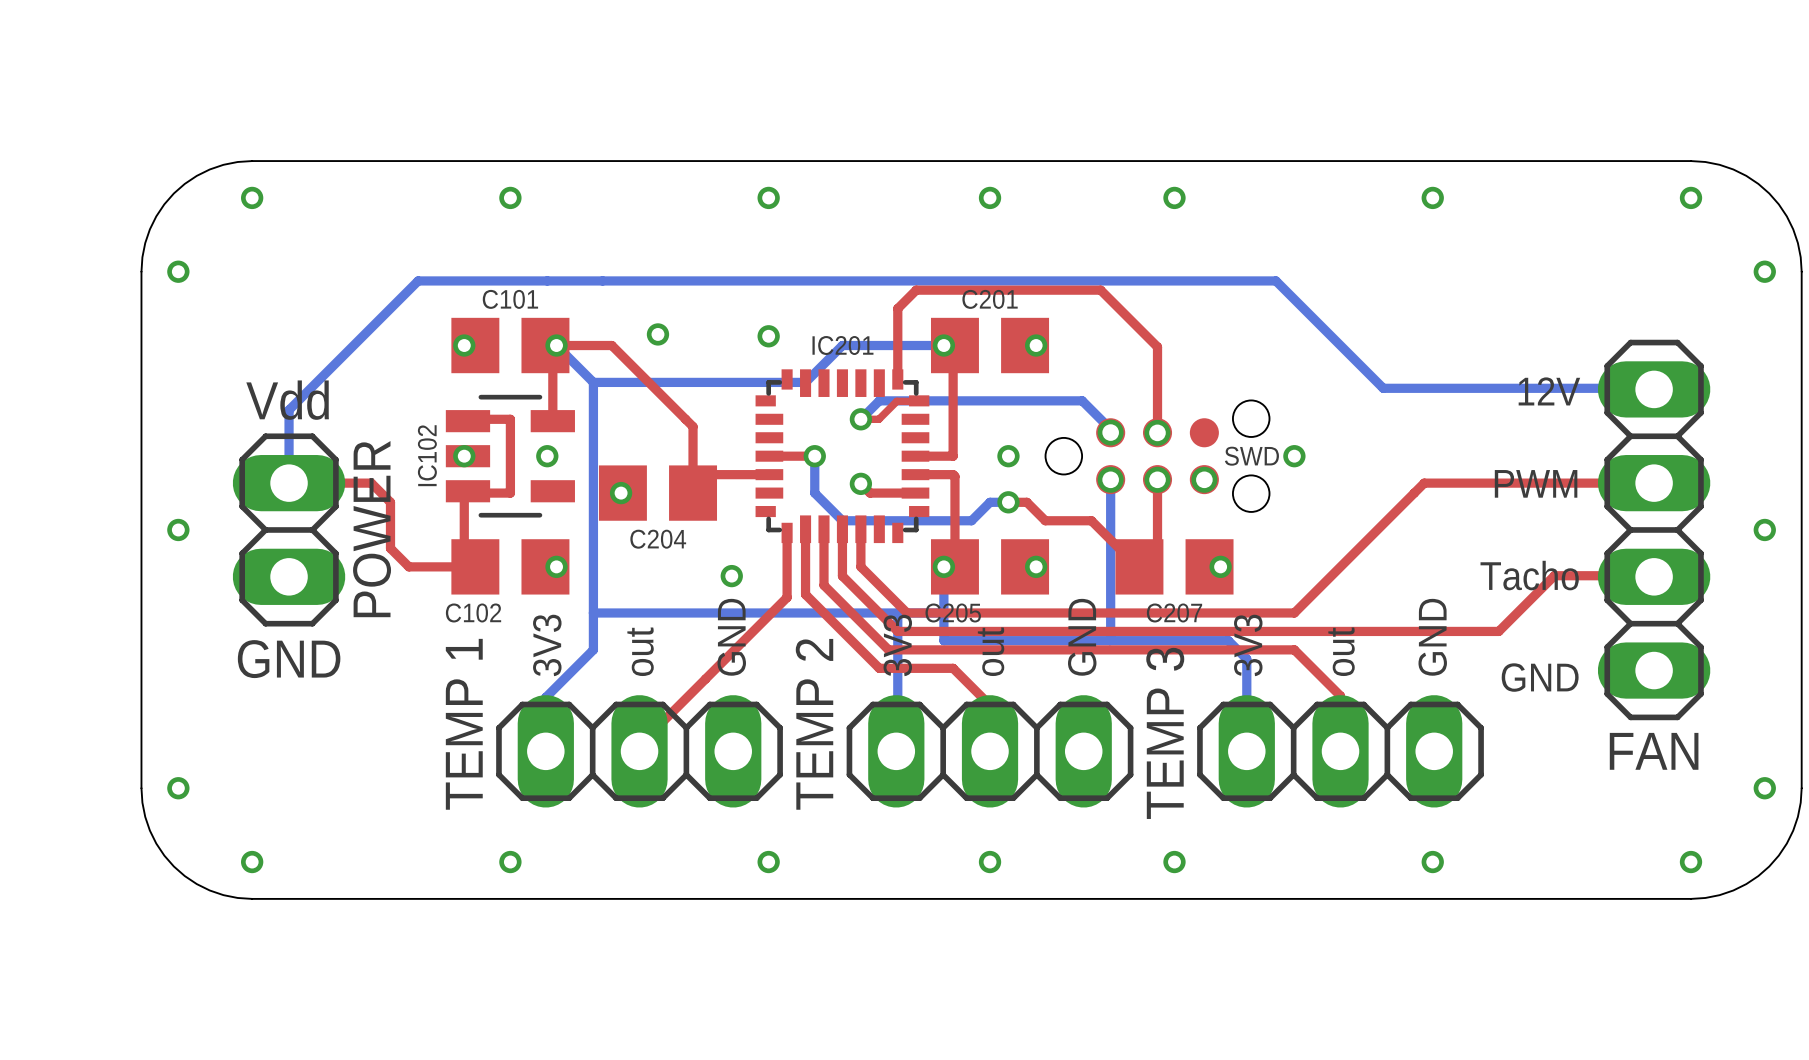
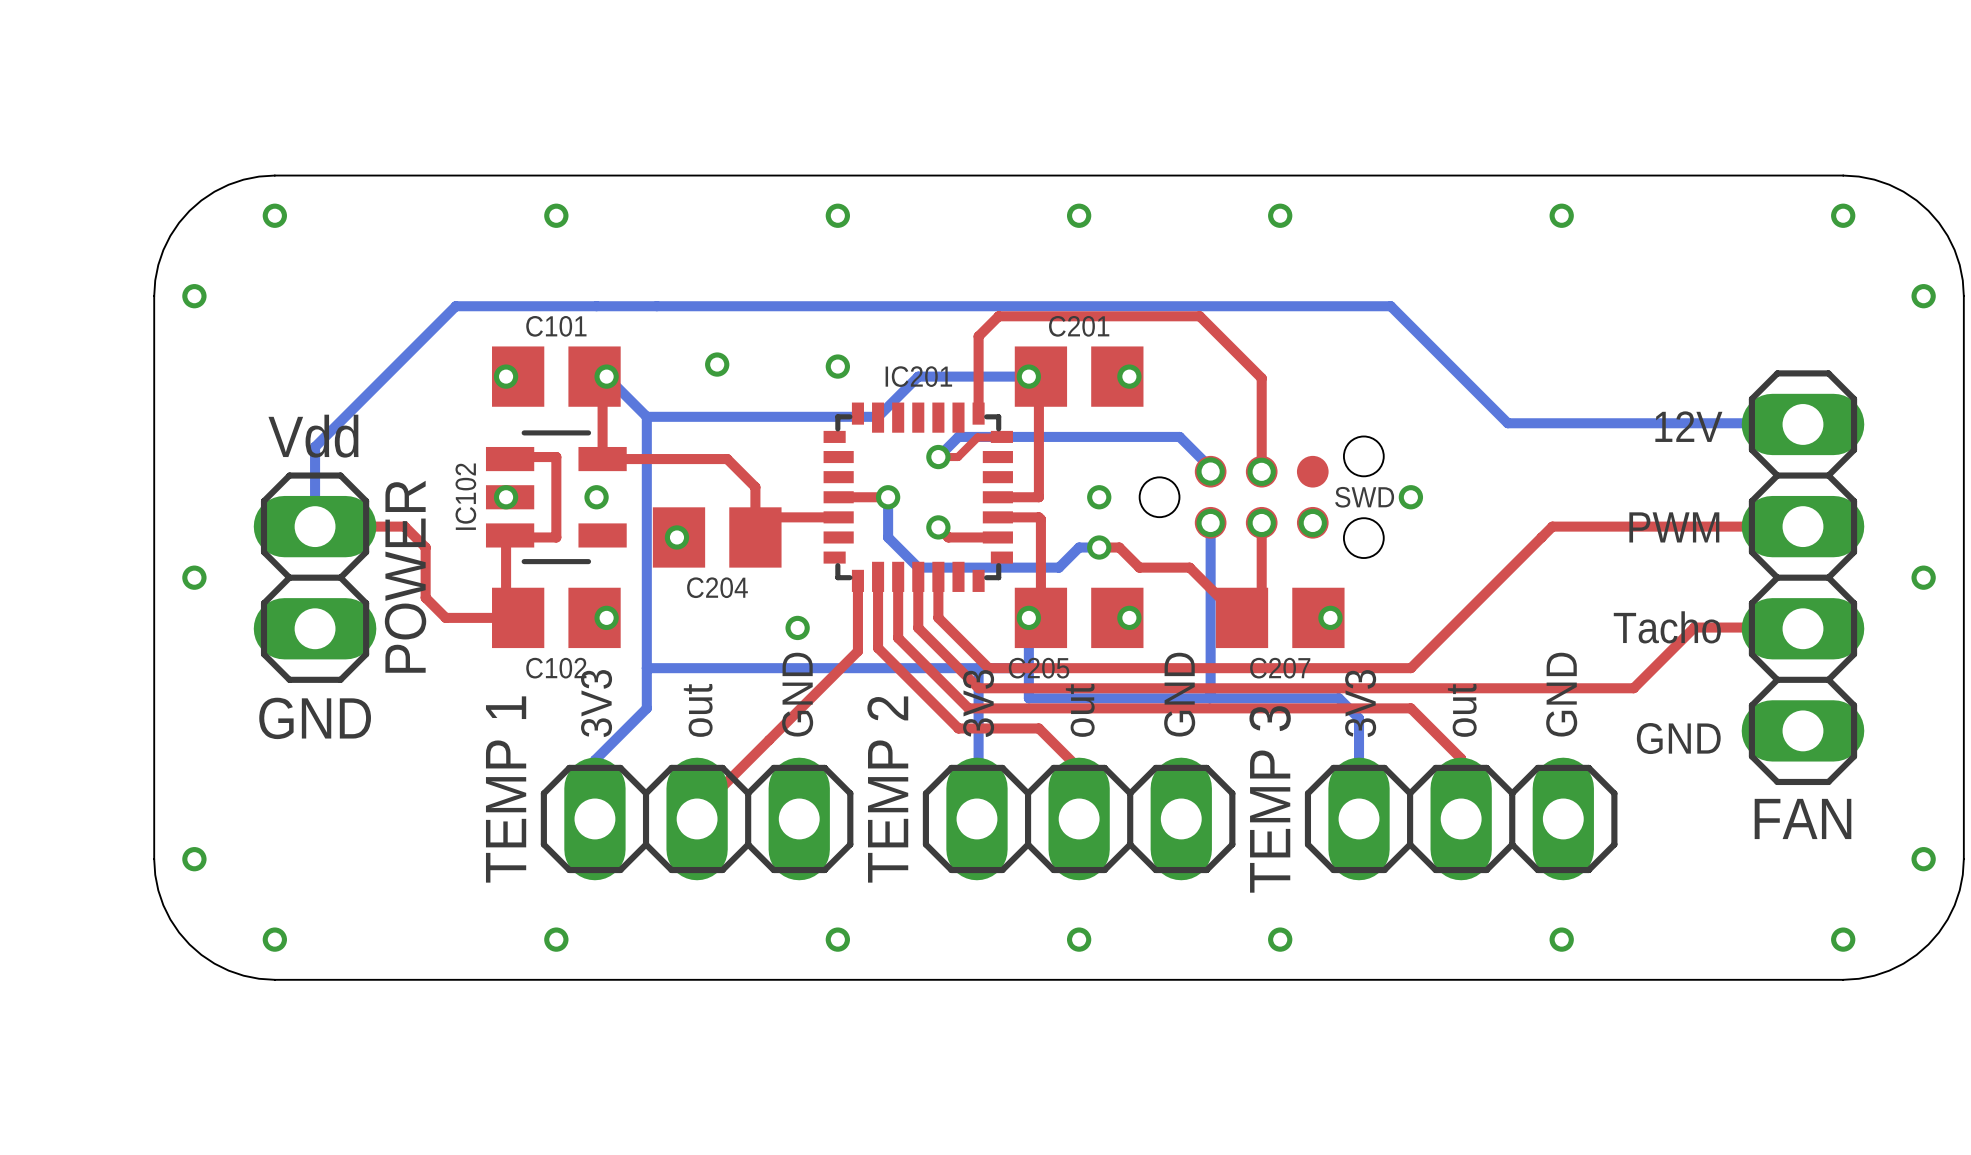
top track: (556, 345) (611, 345) (693, 426) (693, 446) -> (602, 459) (727, 459) (755, 487)
C102 name position: C102 (473, 612) -> C102 (556, 668)

